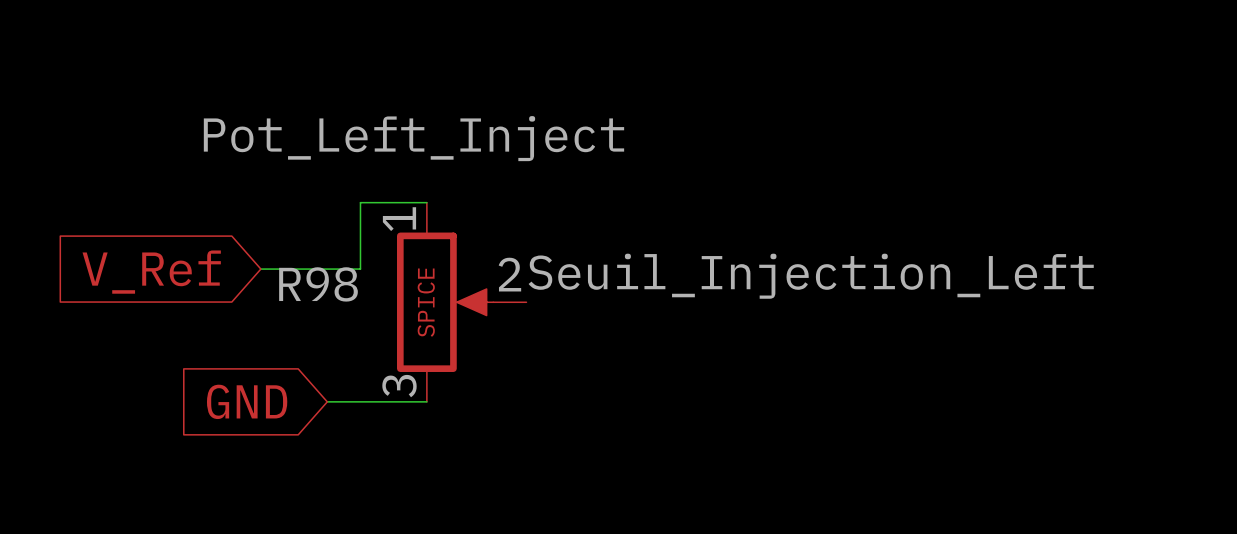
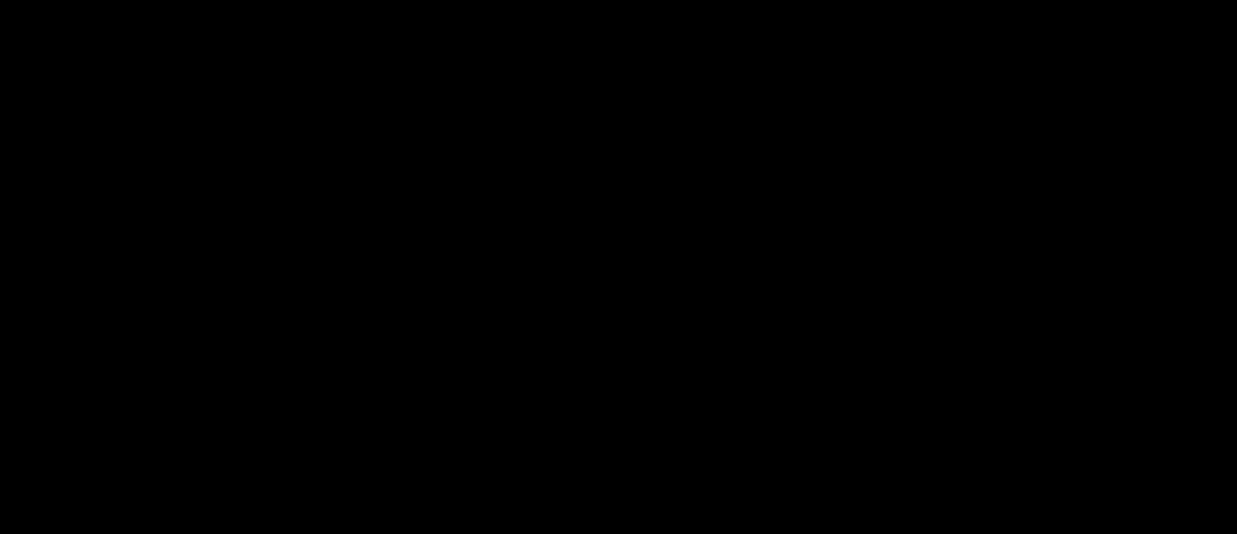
wire: (426, 202) (360, 202) (360, 269) (260, 269) -> none
global label: V_Ref (151, 272) -> none
label: Seuil_Injection_Left (811, 276) -> none
R98: (461, 302) -> none
global label: GND (247, 401) -> none
wire: (327, 401) (426, 401) -> none

